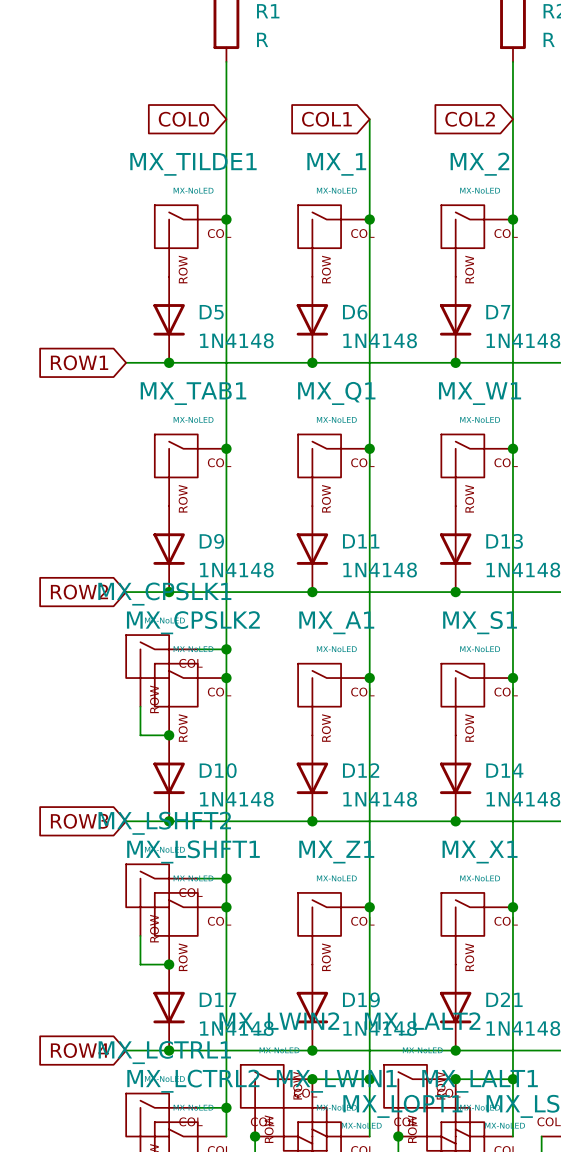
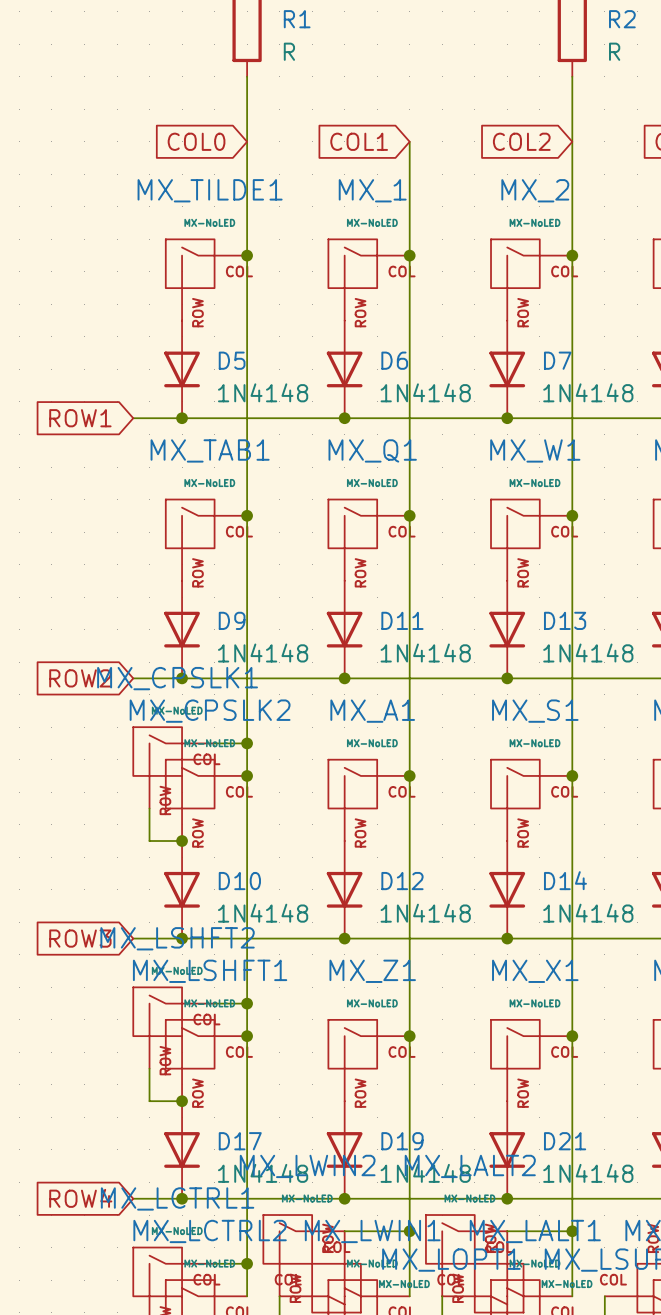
junction: (312, 1079) -> none
junction: (455, 1079) -> none
junction: (255, 1136) -> none
junction: (398, 1136) -> none

